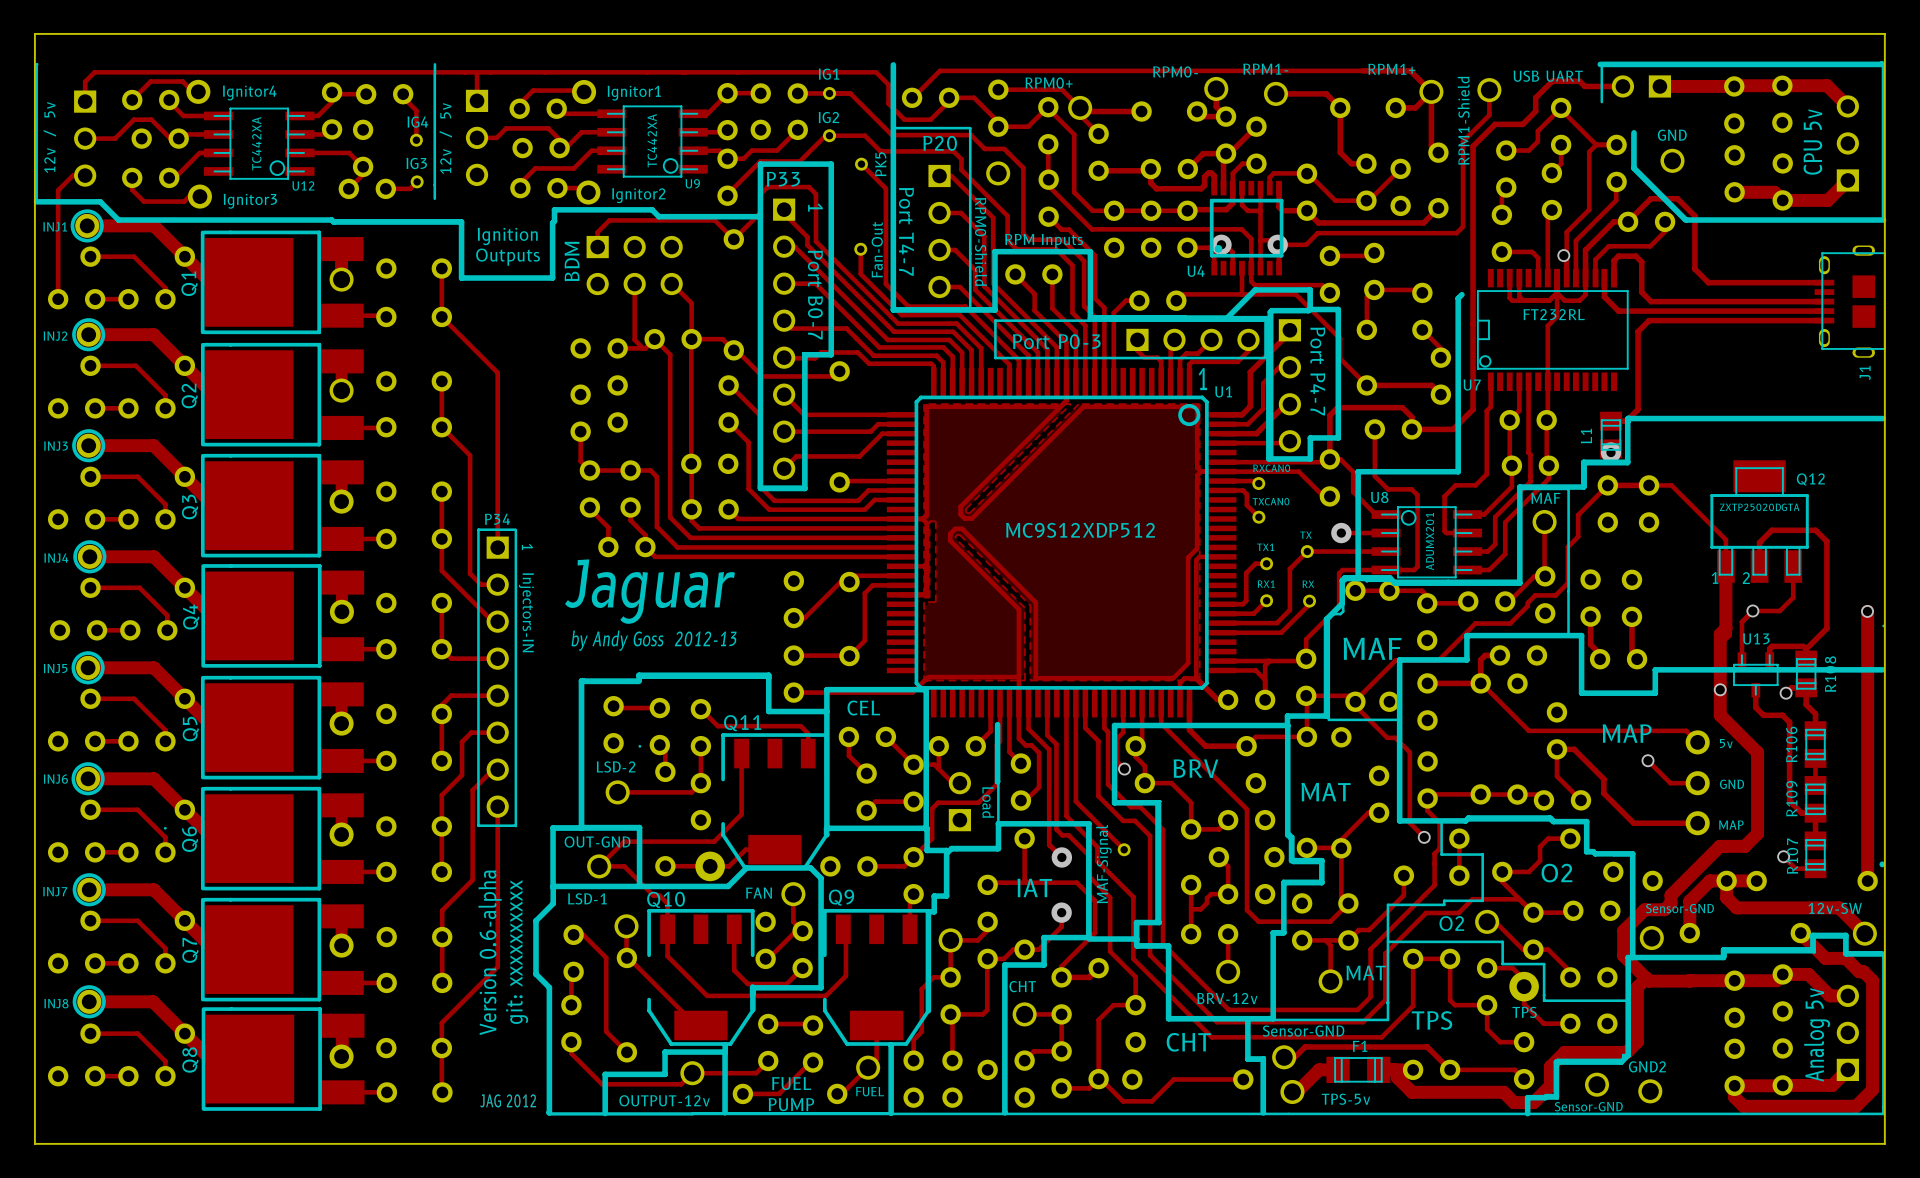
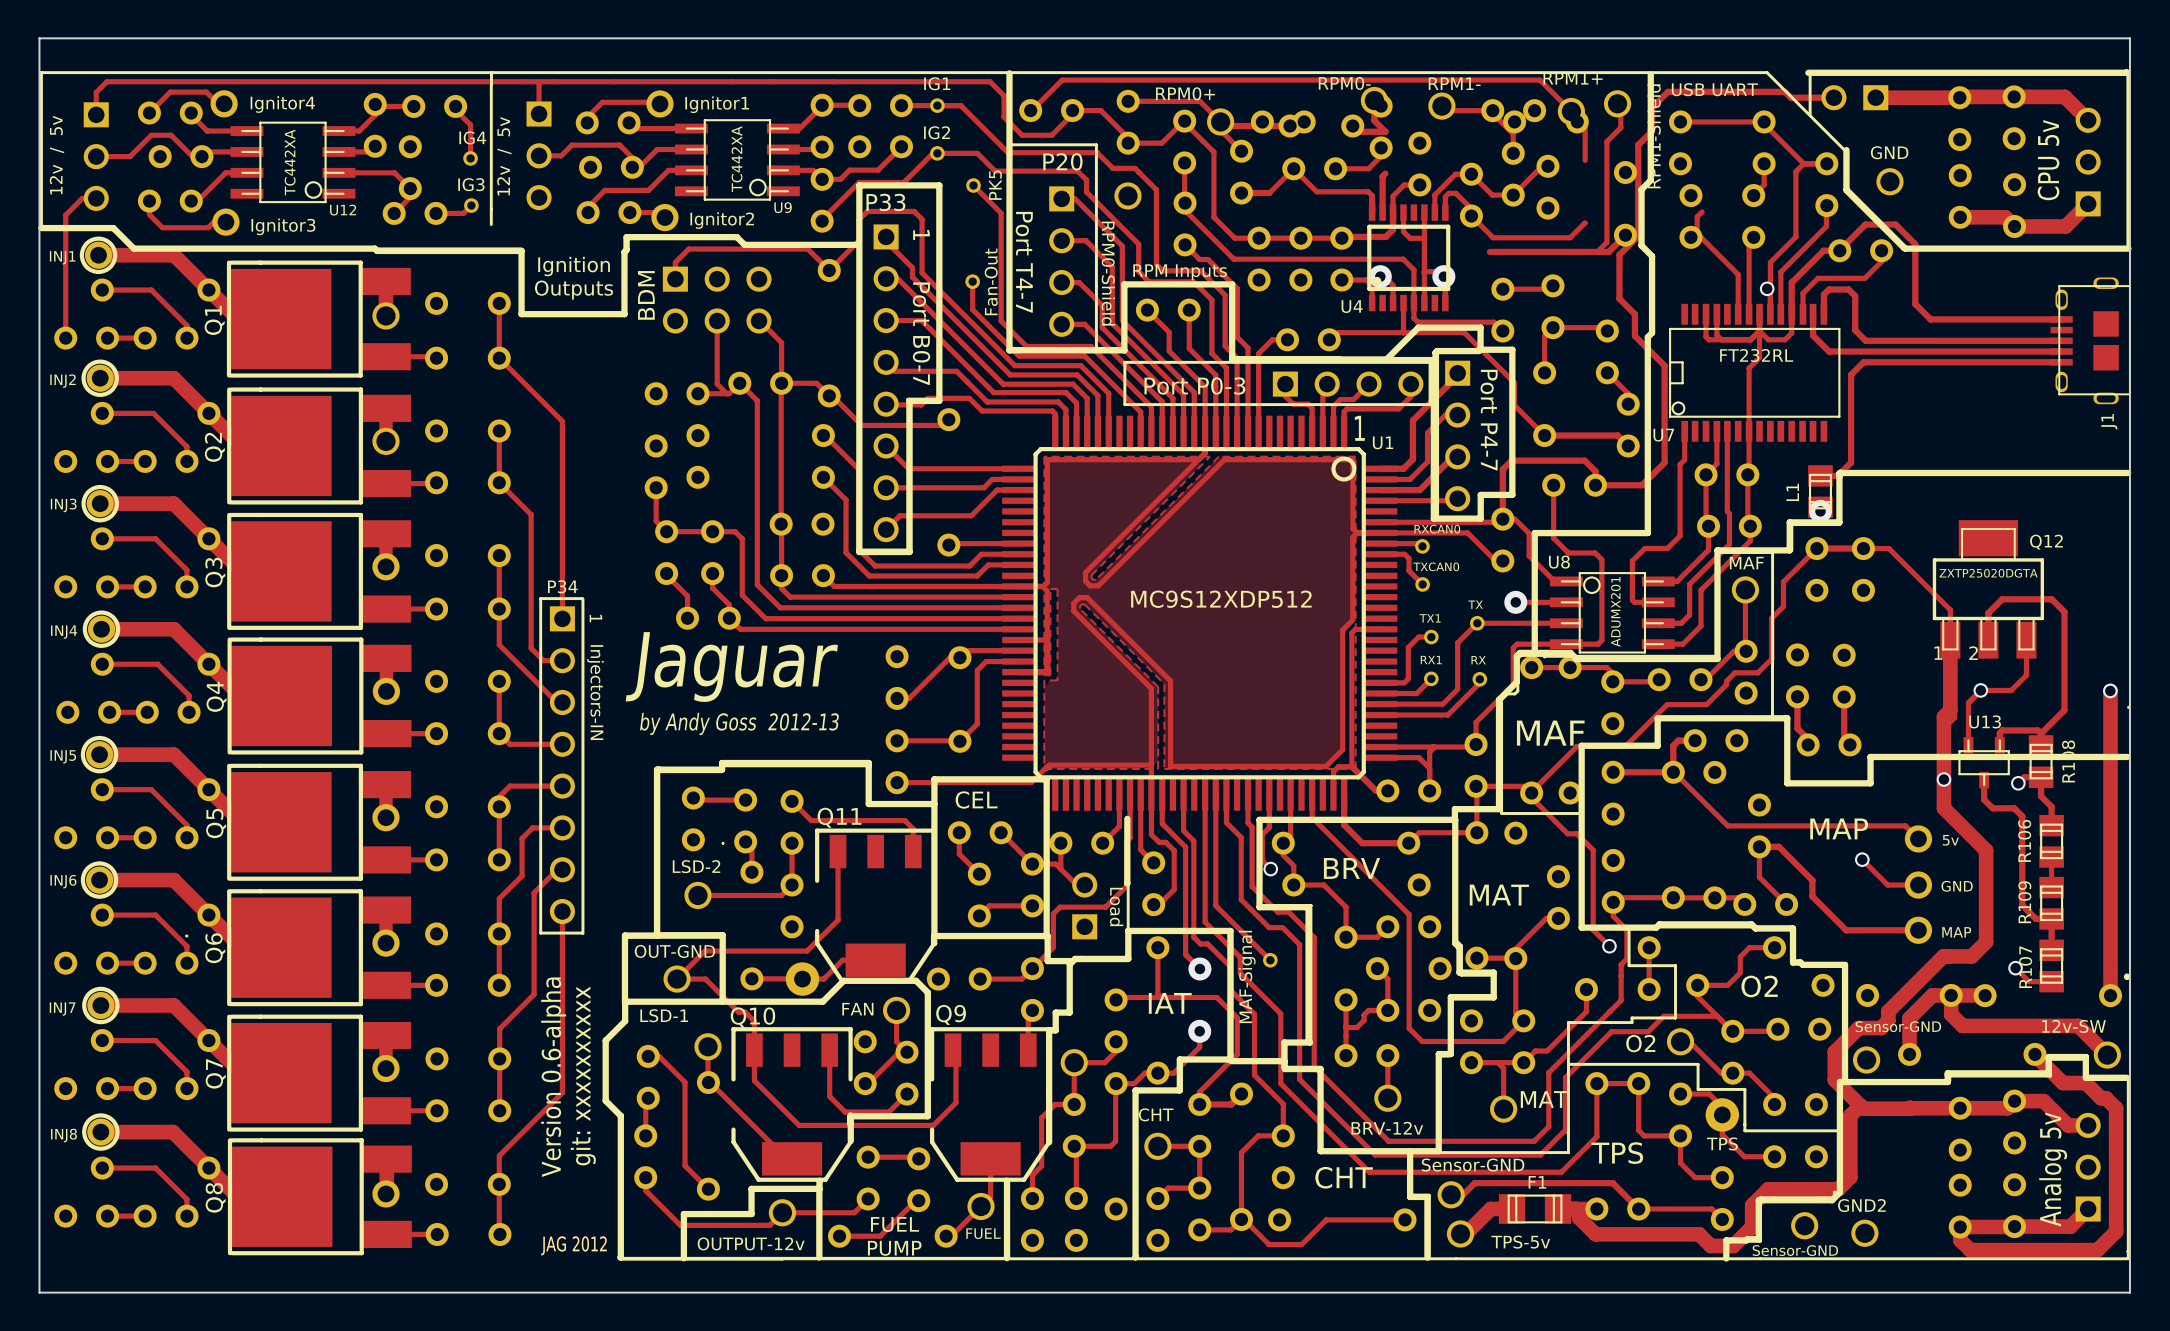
line: none -> (42, 72) (1767, 72) (1845, 150)
line: none -> (1650, 74) (1650, 180) (1641, 189) (1641, 245) (1652, 256) (1652, 332)
text position: RPM1- (1265, 69) -> RPM1- (1454, 83)
track: (1362, 70) (1410, 70) (1431, 91) -> (1539, 80) (1585, 125) (1585, 160)
text position: RPM0- (1175, 71) -> RPM0- (1344, 83)
text position: USB UART (1548, 76) -> USB UART (1714, 89)
track: (1552, 81) (1535, 97) (1535, 111) (1522, 124) (1495, 124) (1473, 146) (1473, 323) -> (1754, 91) (1667, 91) (1652, 107) (1652, 131) (1638, 144) (1638, 236) (1619, 254) (1619, 298) (1634, 314) (1634, 336) (1664, 365)
track: none -> (1620, 101) (1620, 127) (1606, 141) (1606, 242) (1597, 251)
track: (1489, 90) (1489, 115) (1463, 141) (1463, 226) (1456, 233) (1317, 233) (1306, 244) (1277, 244) -> none
part position: (1489, 90) -> (1571, 111)
track: (1431, 91) (1415, 107) (1395, 107) -> none
track: (1431, 91) (1431, 145) (1438, 152) -> none
track: (1275, 93) (1326, 93) (1340, 107) (1340, 152) (1351, 163) (1366, 163) -> none
track: none -> (1452, 110) (1492, 110) (1492, 113) (1513, 134) (1513, 153)
part: none -> (1513, 110)
part: none -> (1283, 121)
track: (1561, 107) (1537, 131) (1537, 141) (1528, 150) (1506, 150) -> (1764, 121) (1680, 121)
track: (1256, 126) (1229, 153) (1203, 153) (1187, 169) -> none
part: none -> (1680, 142)
track: none -> (1381, 147) (1381, 156) (1368, 168) (1335, 168)
part position: (1226, 135) -> (1381, 126)
part: none -> (1513, 174)
track: (1400, 168) (1368, 200) (1335, 200) (1308, 173) (1273, 173) (1269, 177) -> (1547, 166) (1542, 166) (1513, 195) (1492, 195) (1471, 174) (1455, 174) (1434, 194) (1434, 200)
part position: (1169, 169) -> (1314, 168)
part: (1506, 169) -> none
track: (1123, 170) (1149, 170) (1150, 169) (1150, 183) (1156, 188) (1201, 188) (1204, 185) (1204, 176) (1208, 173) (1214, 175) -> (1269, 193) (1293, 168) (1316, 191) (1368, 191) (1372, 195) (1372, 198)
part position: (1366, 182) -> (1547, 187)
part: (1400, 187) -> none
track: (1279, 188) (1279, 207) (1282, 210) (1307, 210) (1318, 222) -> (1445, 212) (1445, 196) (1448, 193) (1455, 193) (1471, 208) (1471, 216) (1493, 237) (1570, 237) (1585, 223)
part: none -> (1690, 216)
part position: (1307, 192) -> (1471, 195)
part: (1501, 233) -> none
track: (1501, 251) (1532, 251) (1538, 258) -> (1690, 237) (1700, 237) (1738, 274) (1738, 291)

